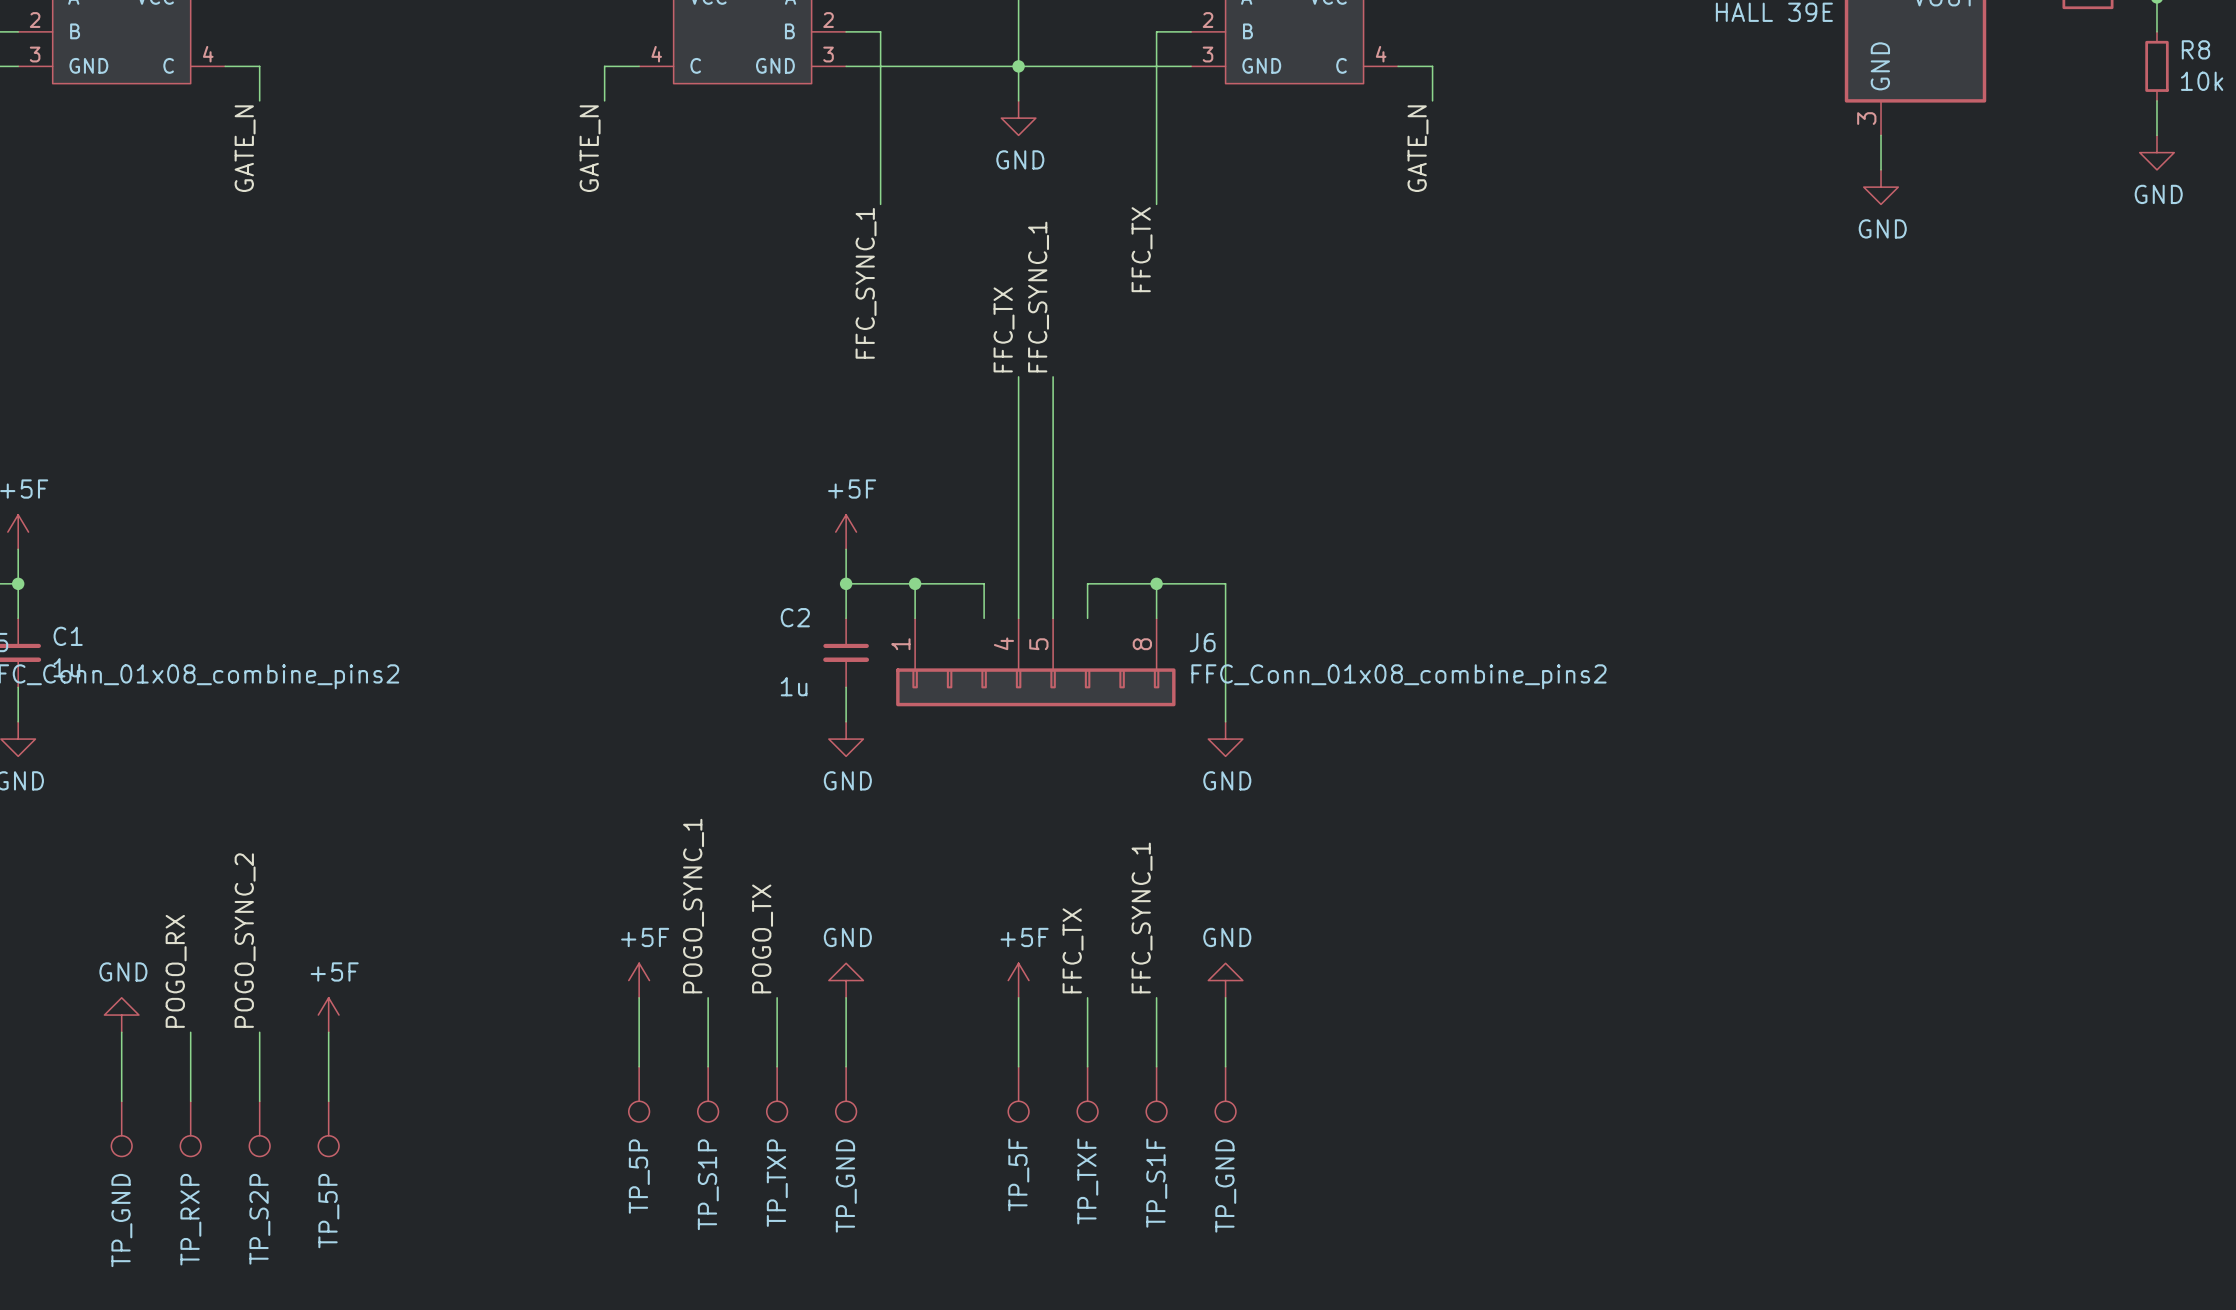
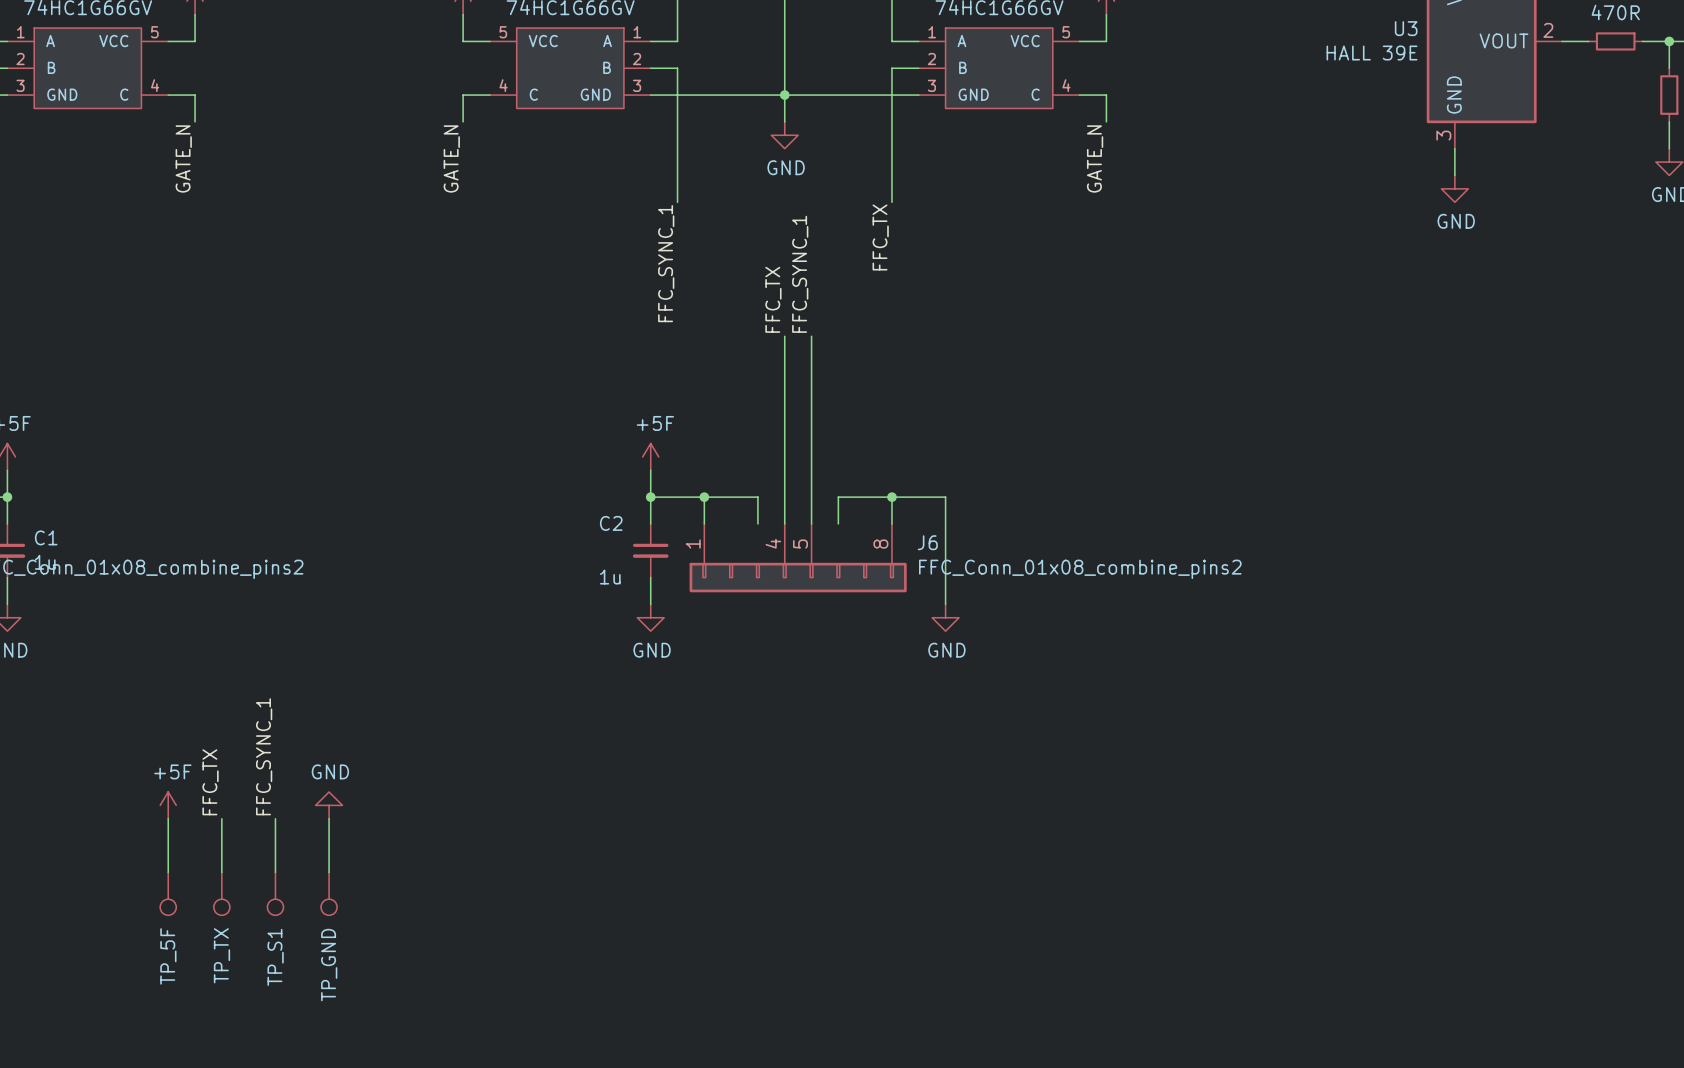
label: POGO_SYNC_1 (693, 906) -> none
label: none -> FFC_SYNC_1 (264, 756)
label: FFC_SYNC_1 (1142, 918) -> none
label: POGO_TX (762, 938) -> none
label: POGO_SYNC_2 (245, 940) -> none
label: none -> FFC_TX (210, 782)
label: FFC_TX (1073, 950) -> none
label: POGO_RX (176, 971) -> none
power symbol: none -> GND (329, 805)
power symbol: +5F (639, 980) -> none
power symbol: GND (846, 980) -> none
power symbol: +5F (1018, 980) -> none
power symbol: GND (1225, 980) -> none
wire: (639, 997) (639, 1066) -> none
wire: (708, 997) (708, 1066) -> none
wire: (777, 997) (777, 1066) -> none
wire: (846, 997) (846, 1066) -> none
wire: (1018, 997) (1018, 1066) -> none
wire: (1087, 997) (1087, 1066) -> none
wire: (1156, 997) (1156, 1066) -> none
wire: (1225, 997) (1225, 1066) -> none
power symbol: GND (121, 1015) -> none
power symbol position: +5F (328, 1015) -> +5F (168, 805)
wire: (121, 1032) (121, 1101) -> (168, 818) (168, 872)
wire: (190, 1032) (190, 1101) -> (221, 818) (221, 872)
wire: (259, 1032) (259, 1101) -> (275, 818) (275, 872)
wire: (328, 1032) (328, 1101) -> (329, 818) (329, 872)
part: none -> TP_5F (168, 893)
part: none -> TP_TX (221, 893)
part: none -> TP_S1 (275, 893)
part: none -> TP_GND (329, 893)
part: TP_5P (639, 1094) -> none
part: TP_S1P (708, 1094) -> none
part: TP_TXP (777, 1094) -> none
part: TP_GND (846, 1094) -> none
part: TP_5F (1018, 1094) -> none
part: TP_TXF (1087, 1094) -> none
part: TP_S1F (1156, 1094) -> none
part: TP_GND (1225, 1094) -> none
part: TP_GND (121, 1128) -> none
part: TP_RXP (190, 1128) -> none
part: TP_S2P (259, 1128) -> none
part: TP_5P (328, 1128) -> none

